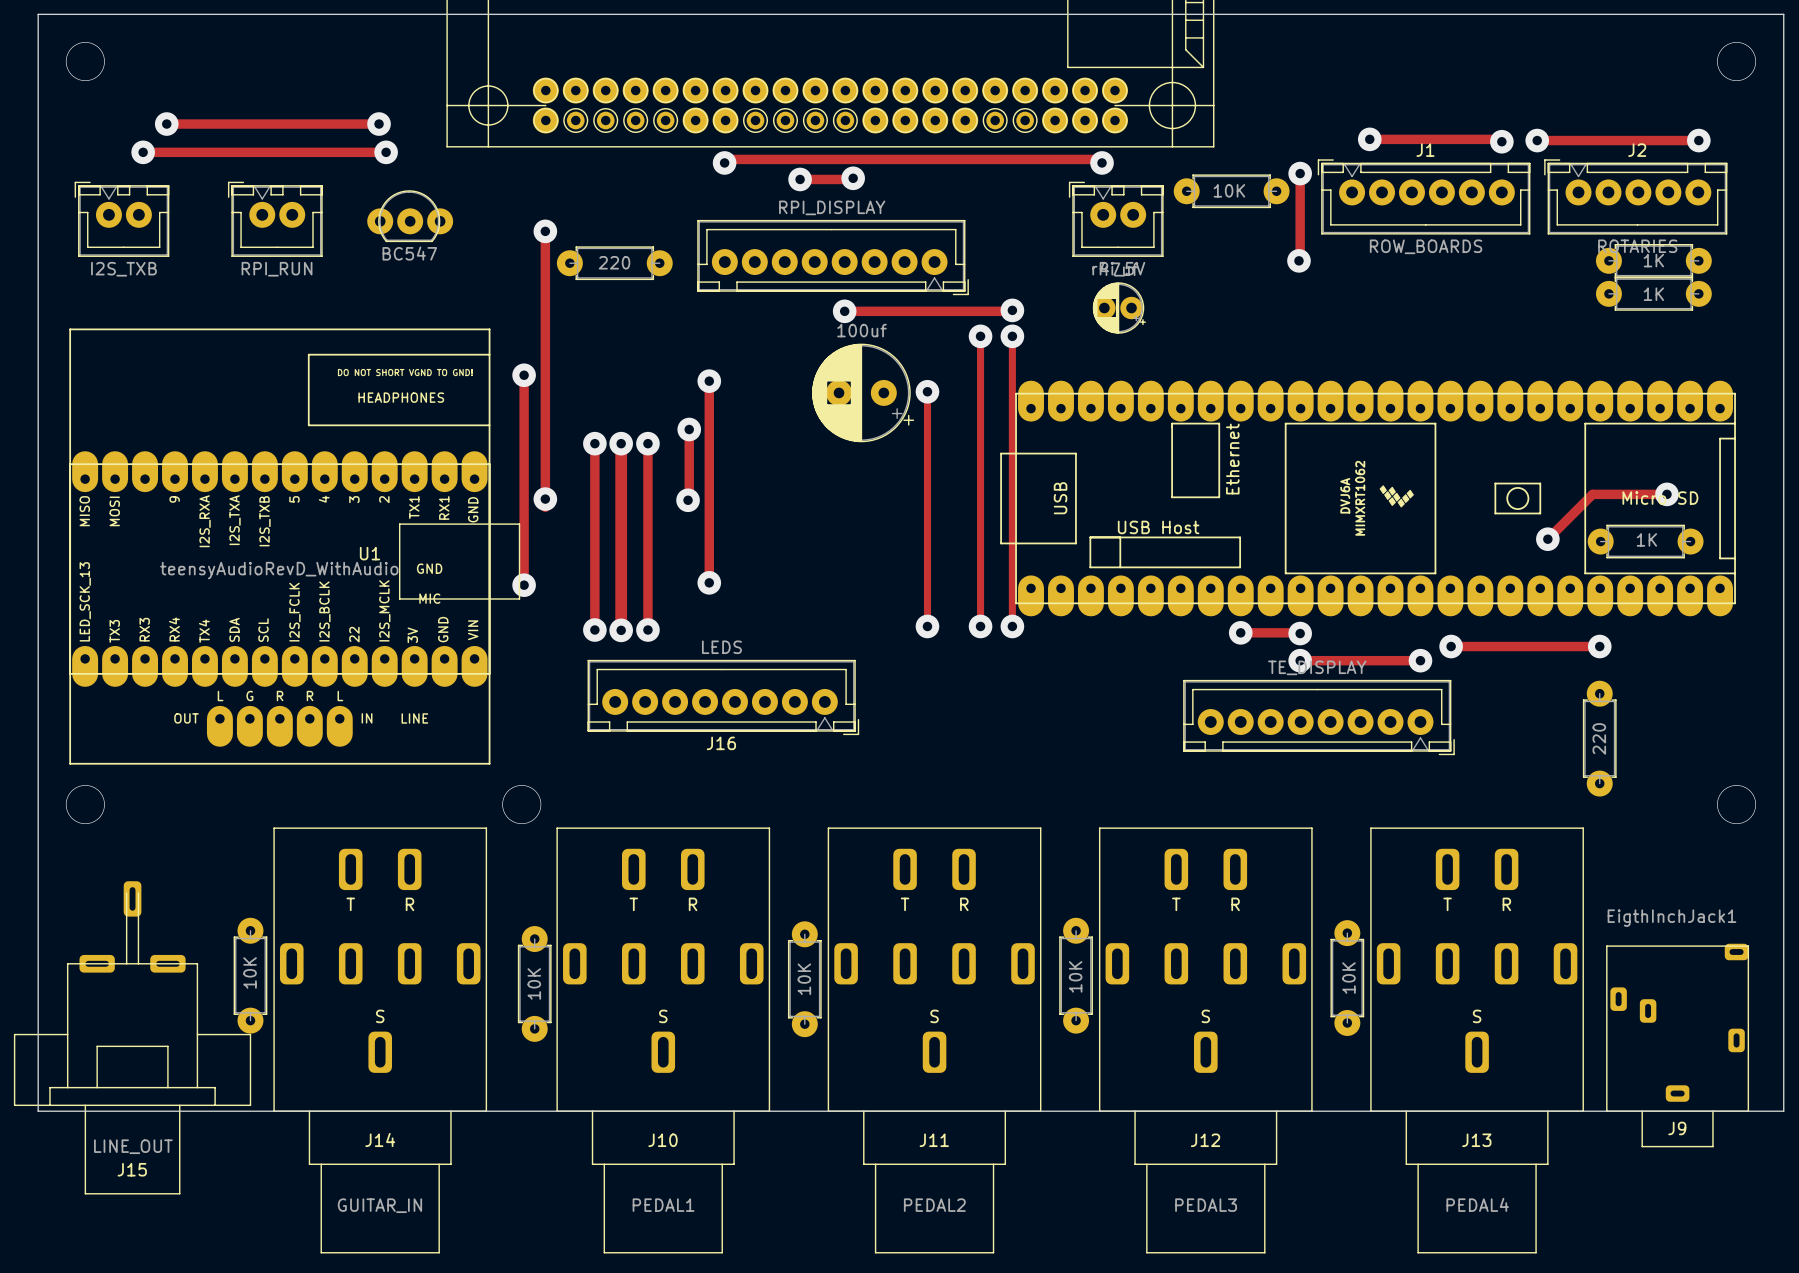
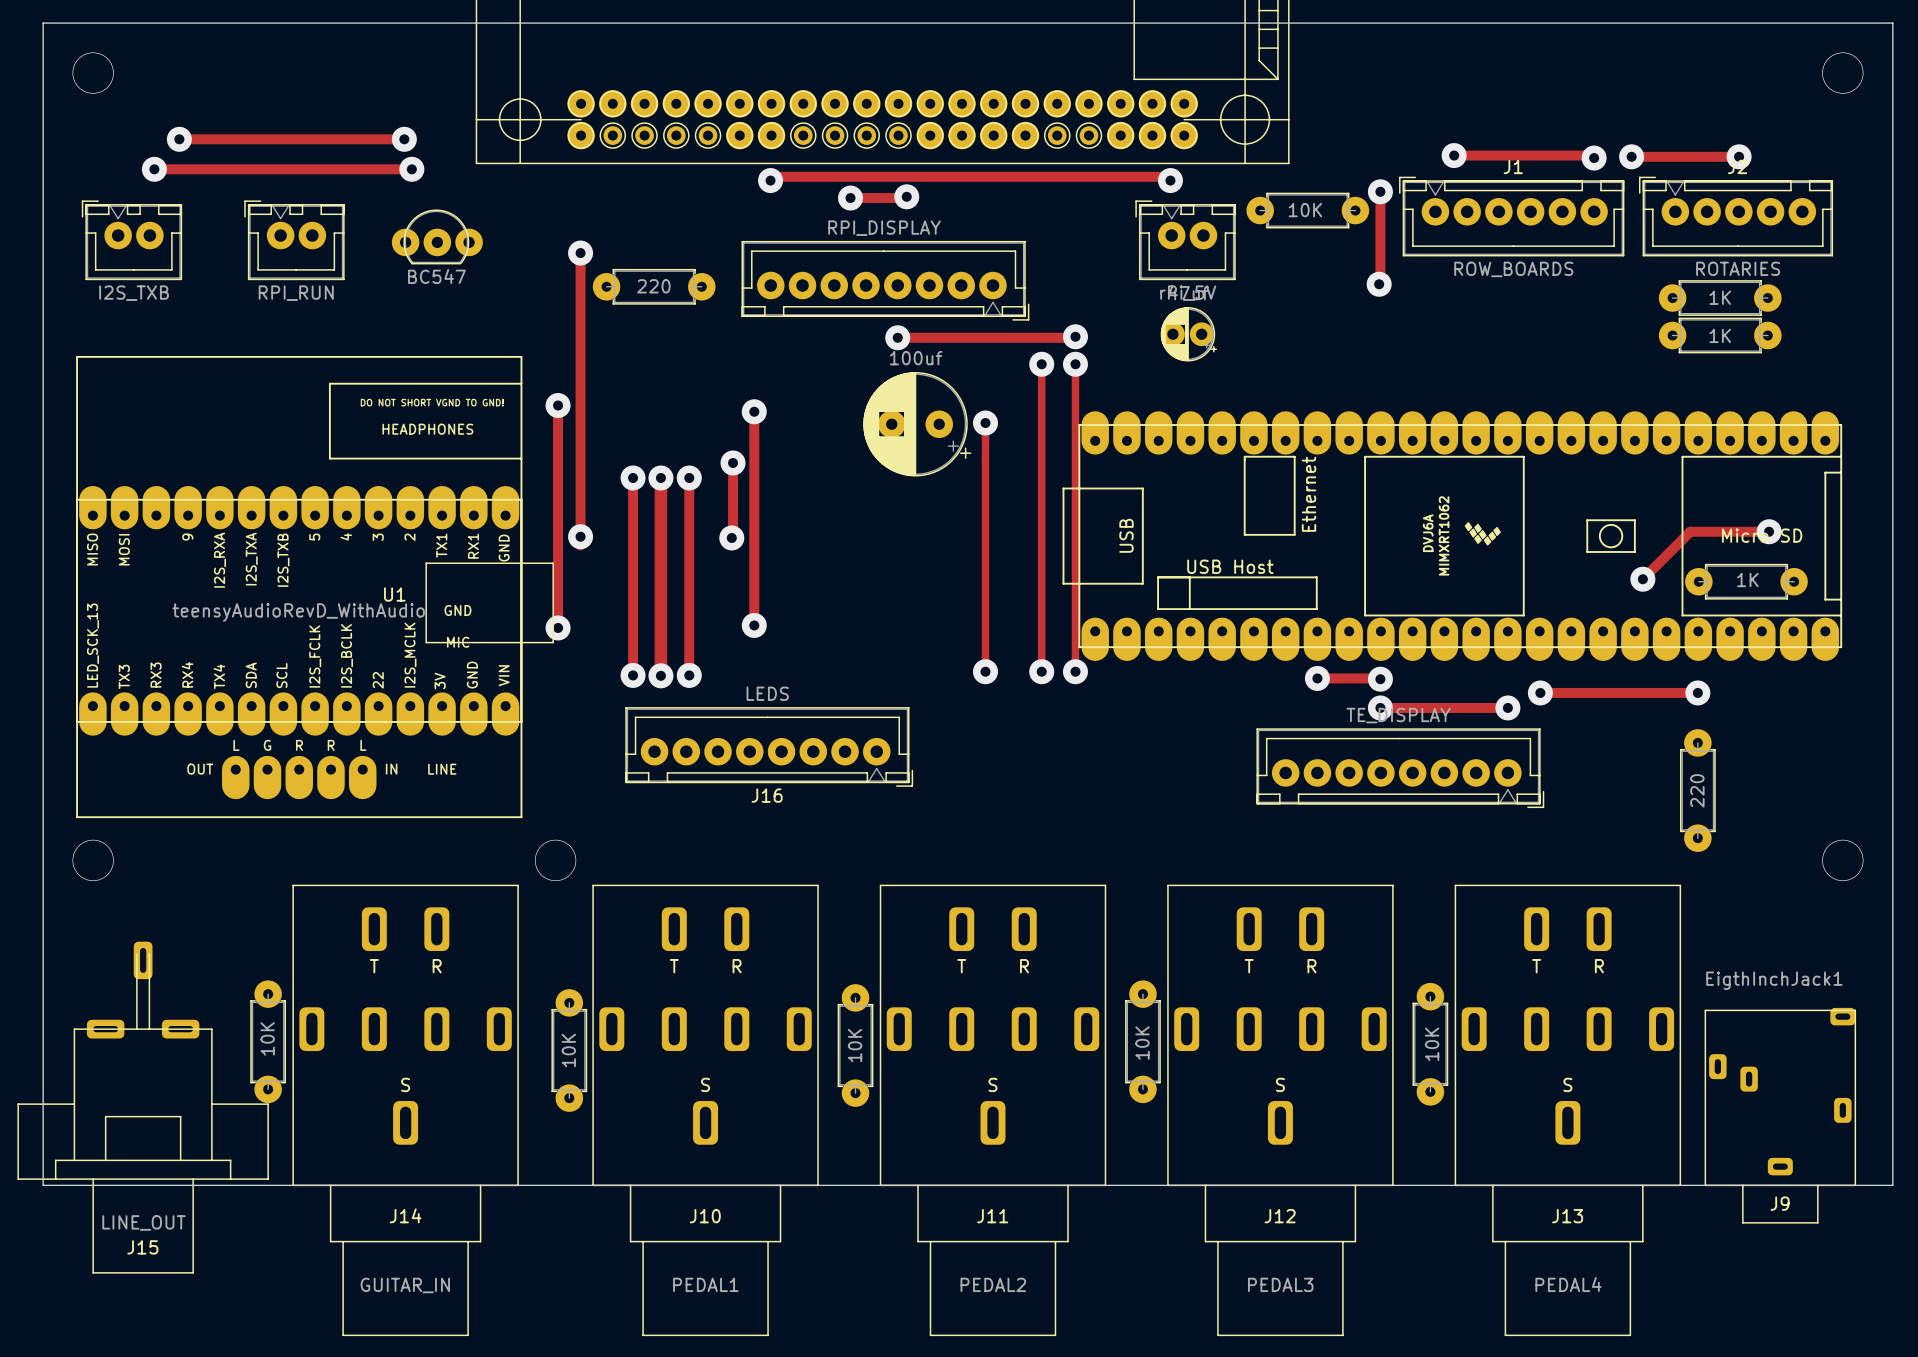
track: (1638, 140) (1698, 140) -> none
via position: (1698, 140) -> (1739, 156)
part: 1K (1653, 260) -> none
part: none -> 1K (1720, 298)
part: 1K (1653, 293) -> none
part: none -> 1K (1720, 335)

